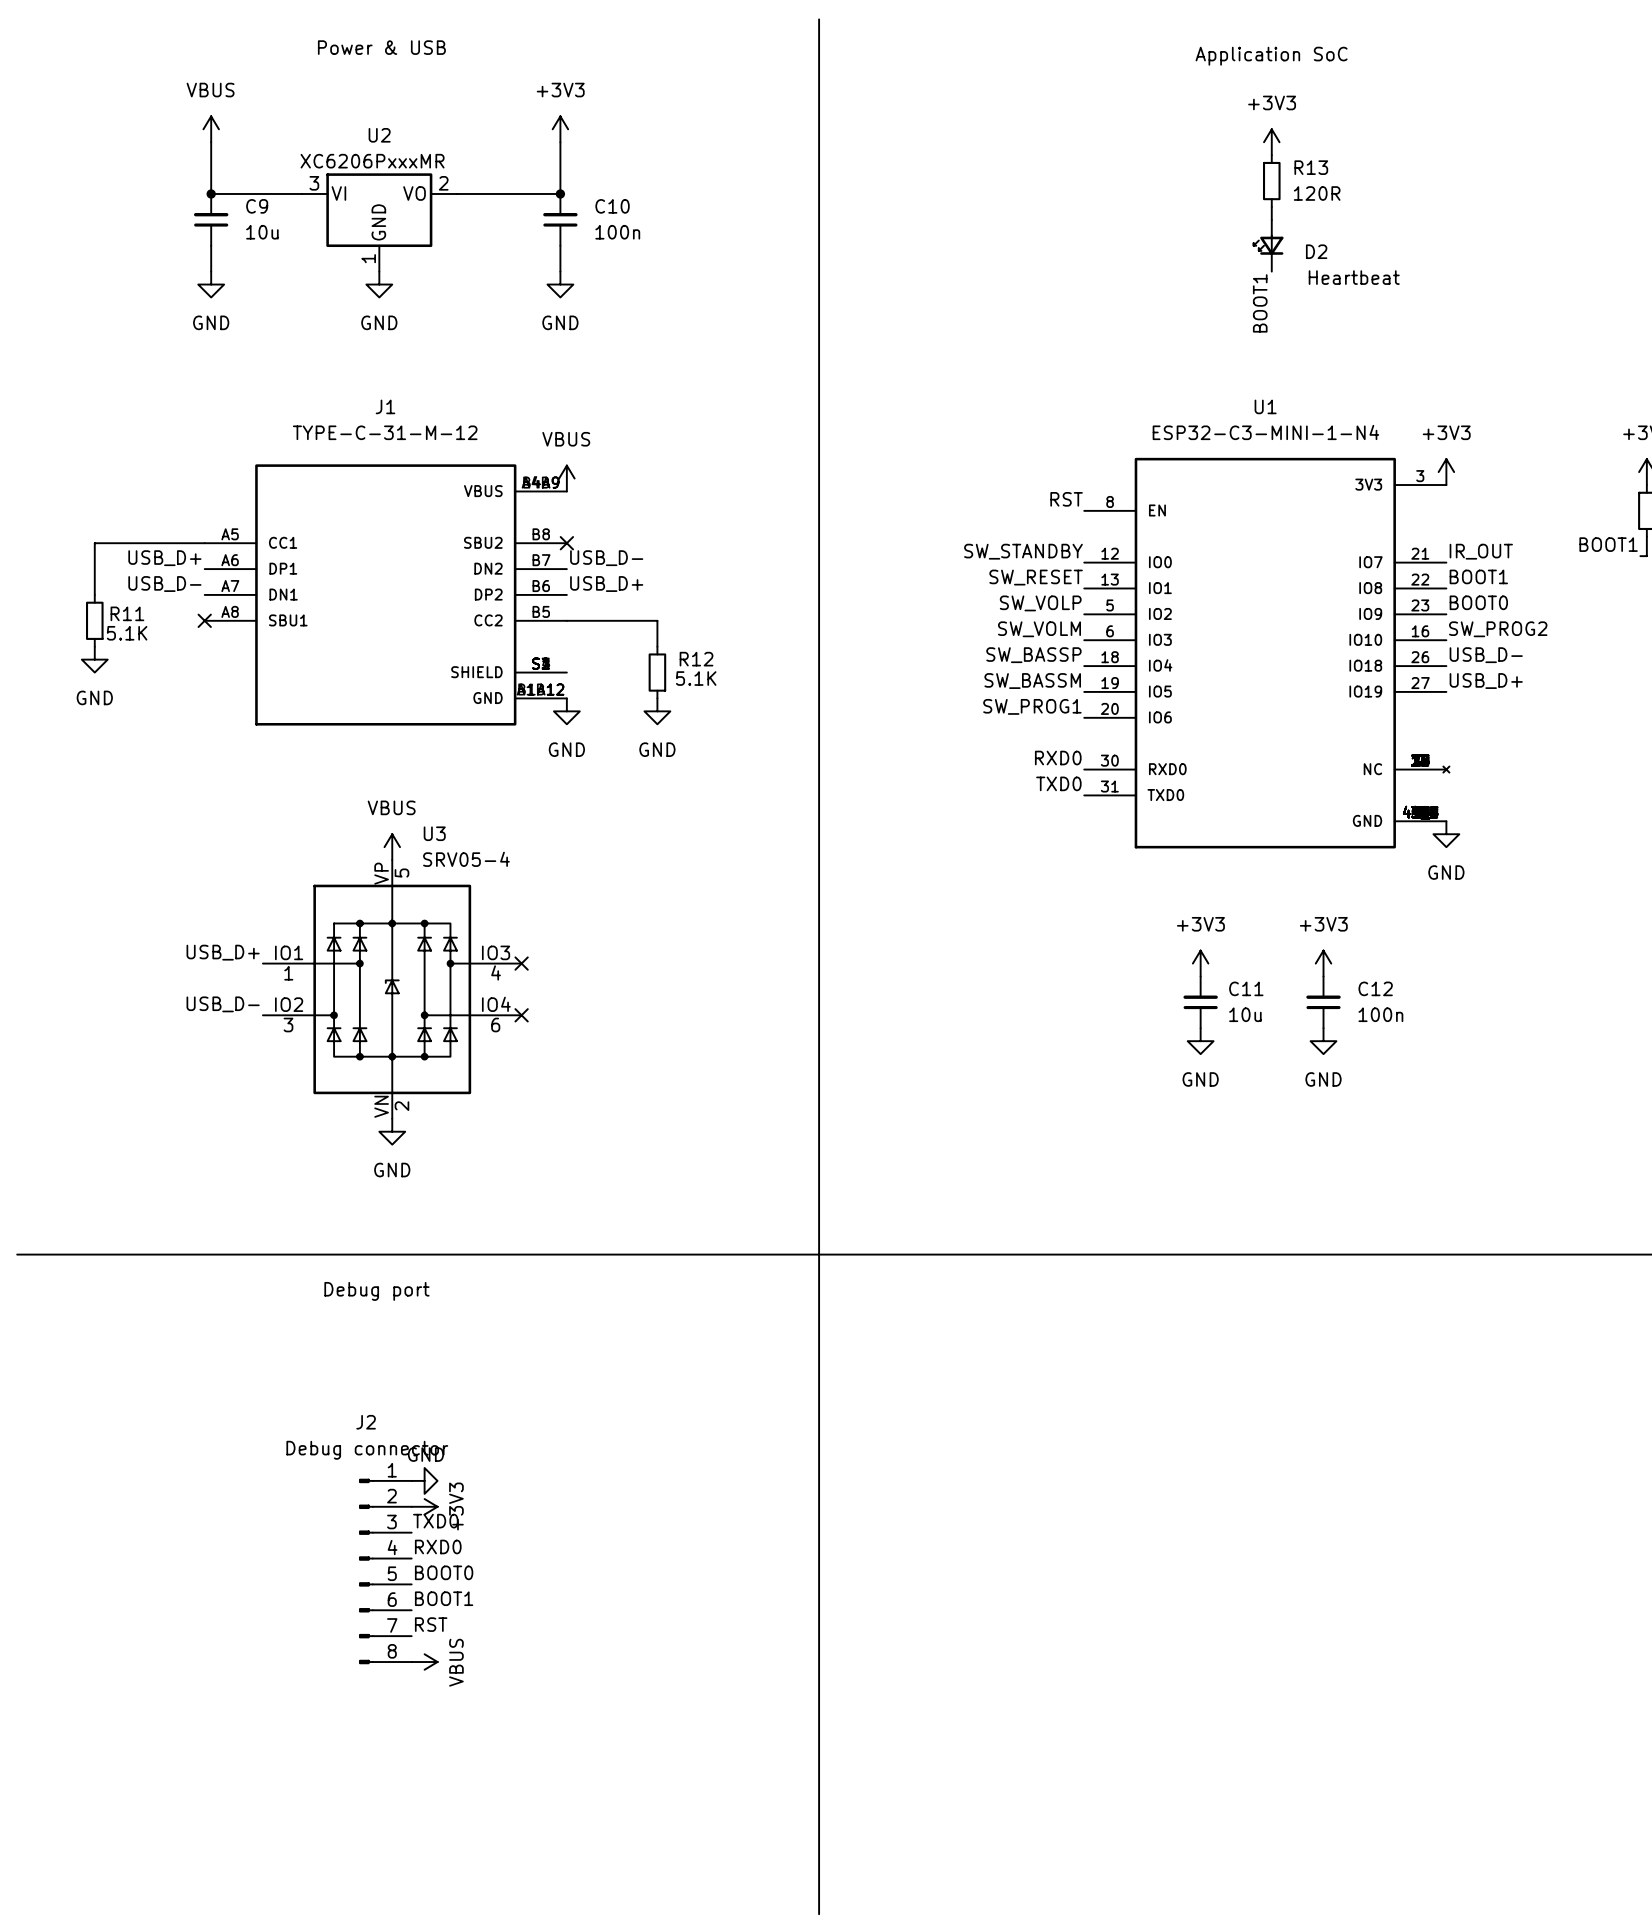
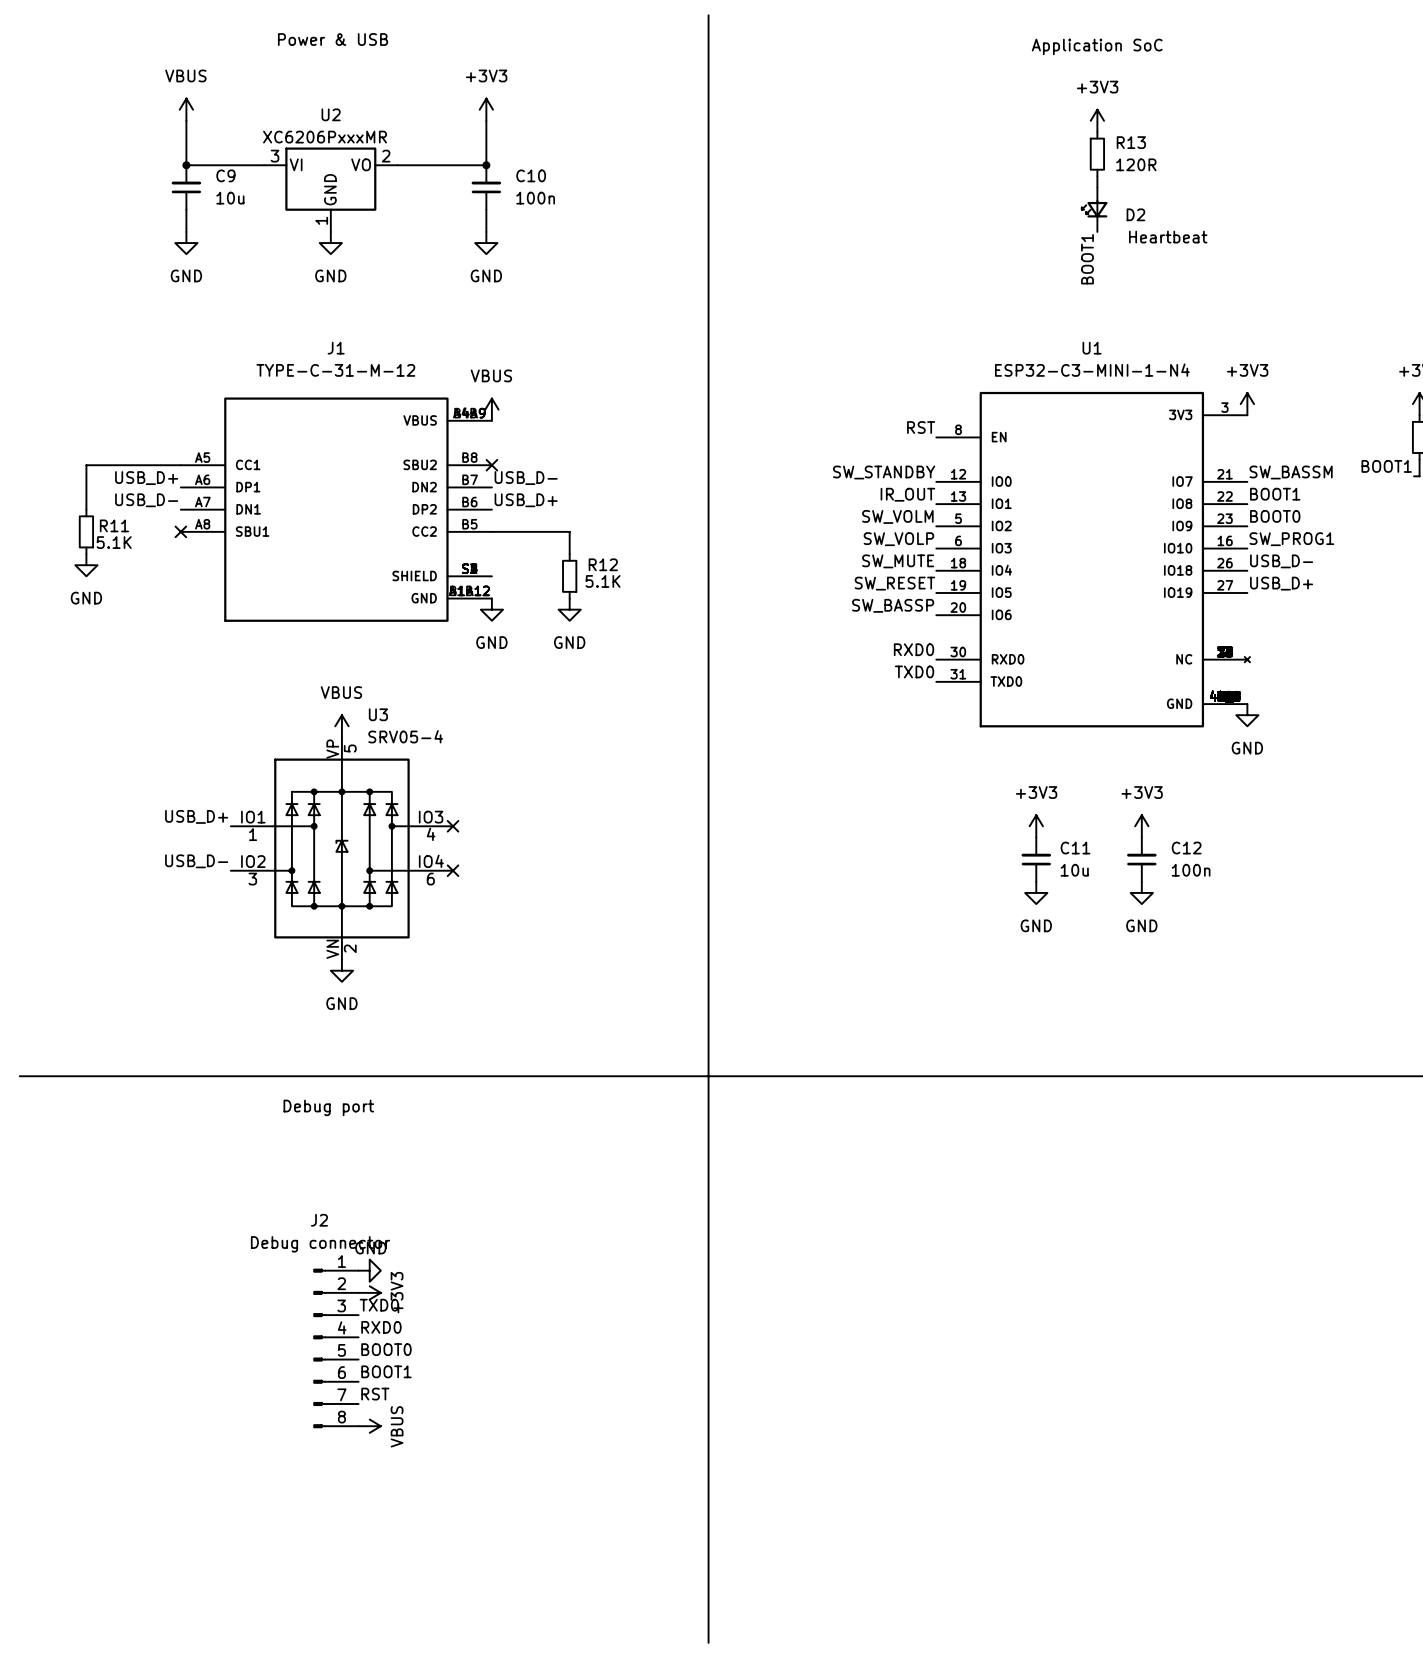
label: IR_OUT (1481, 551) -> SW_BASSM (1291, 472)
label: SW_RESET (1036, 577) -> IR_OUT (907, 494)
label: SW_VOLP (1040, 603) -> SW_VOLM (897, 516)
label: SW_VOLM (1039, 629) -> SW_VOLP (898, 539)
label: SW_PROG2 (1498, 629) -> SW_PROG1 (1291, 539)
label: SW_BASSP (1033, 655) -> SW_MUTE (898, 561)
label: SW_BASSM (1032, 681) -> SW_RESET (894, 583)
label: SW_PROG1 (1032, 706) -> SW_BASSP (893, 605)

